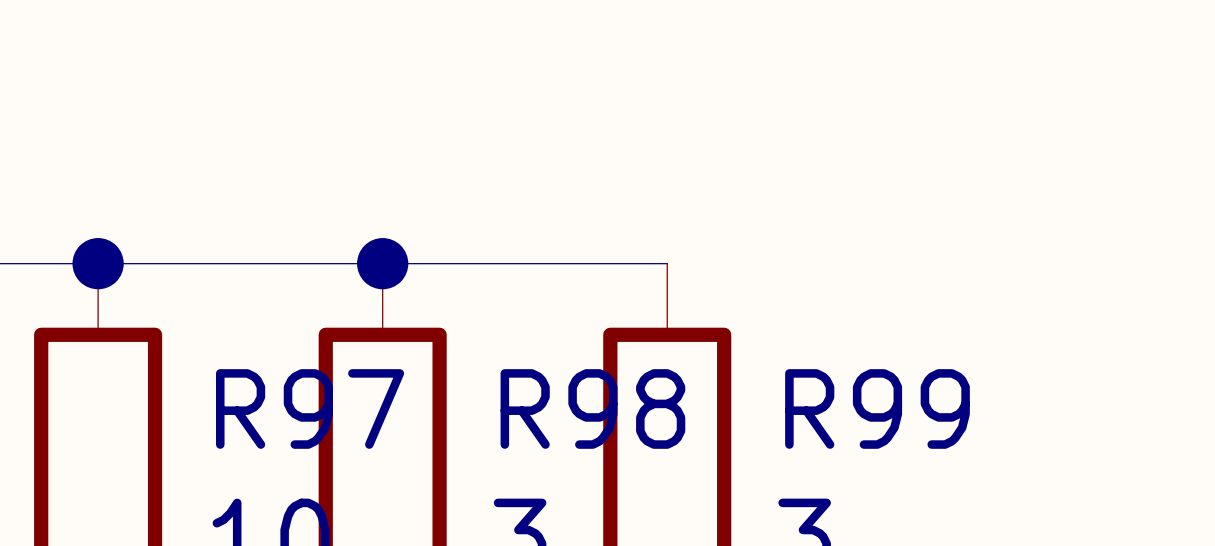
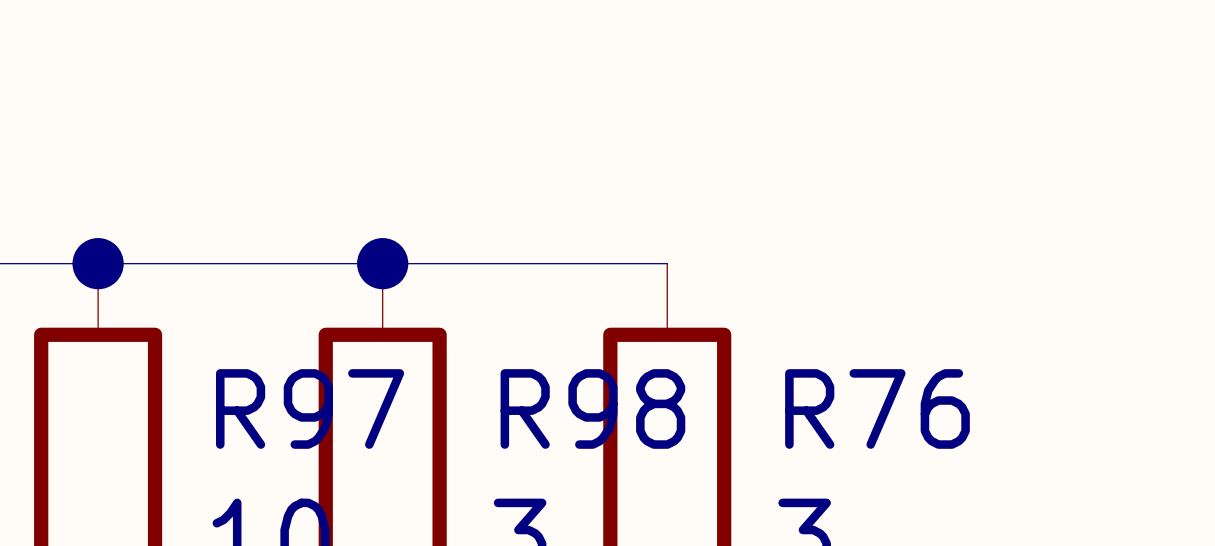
R99 name: R99 (877, 408) -> R76 (877, 408)

